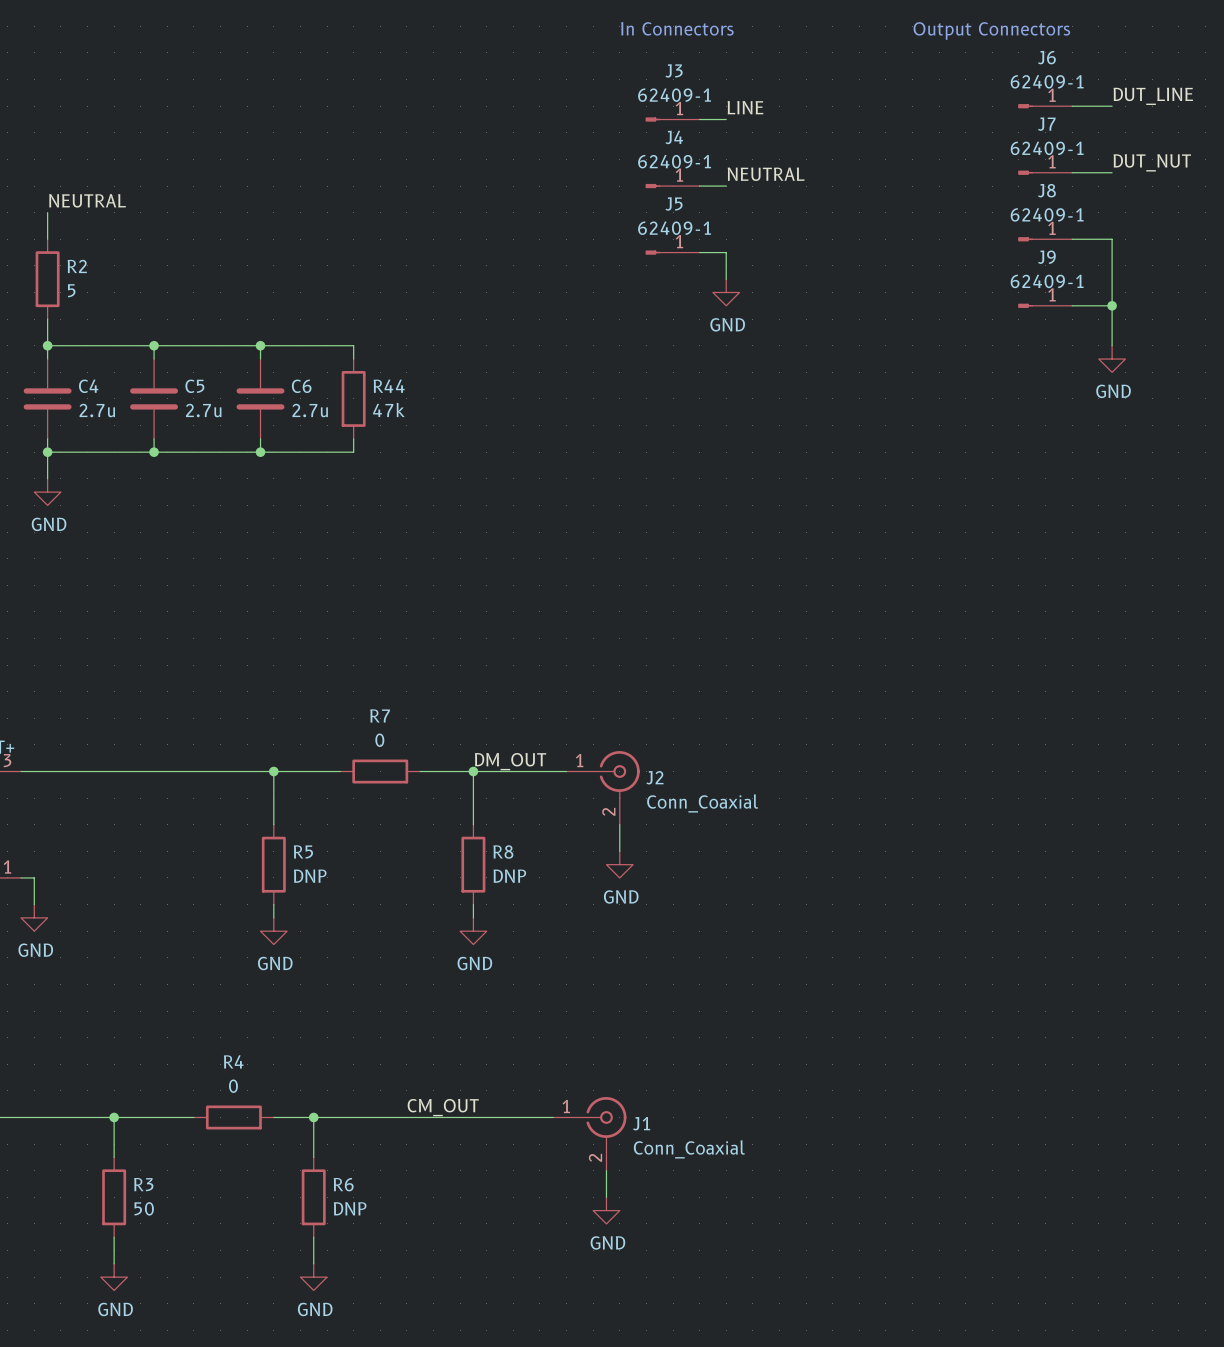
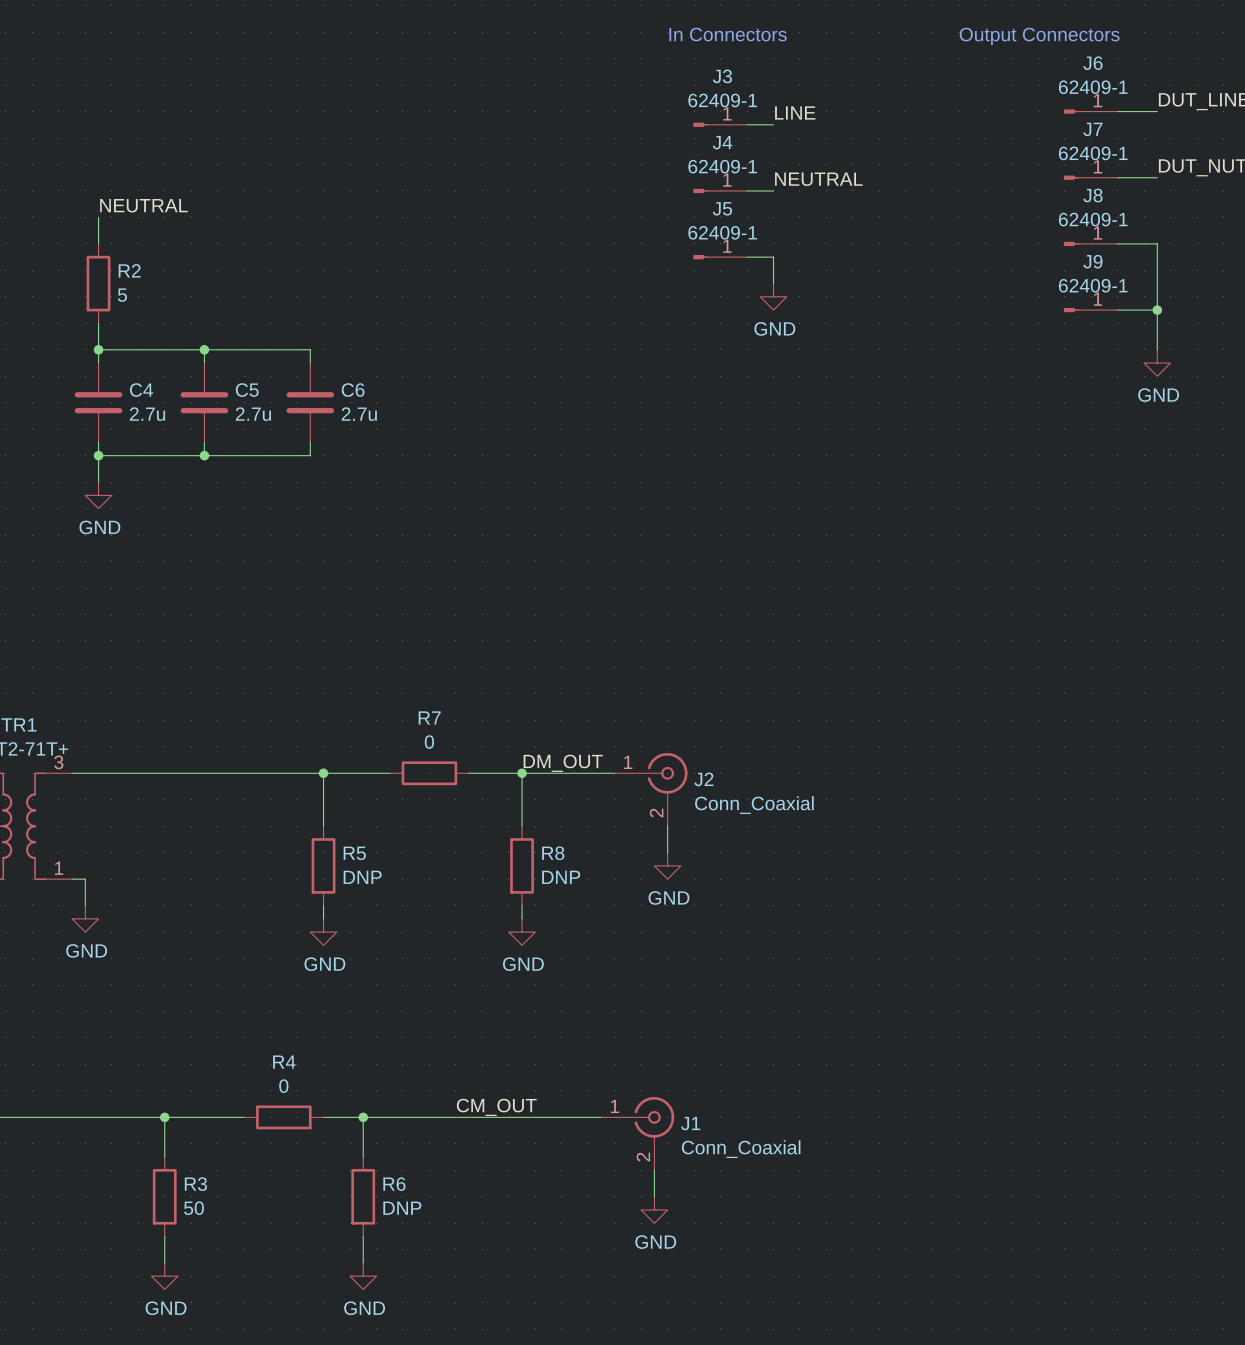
wire: (260, 345) (353, 345) (353, 359) -> none
junction: (260, 345) -> none
R44: 47k (353, 398) -> none
wire: (353, 438) (353, 452) (260, 452) -> none
junction: (260, 452) -> none

